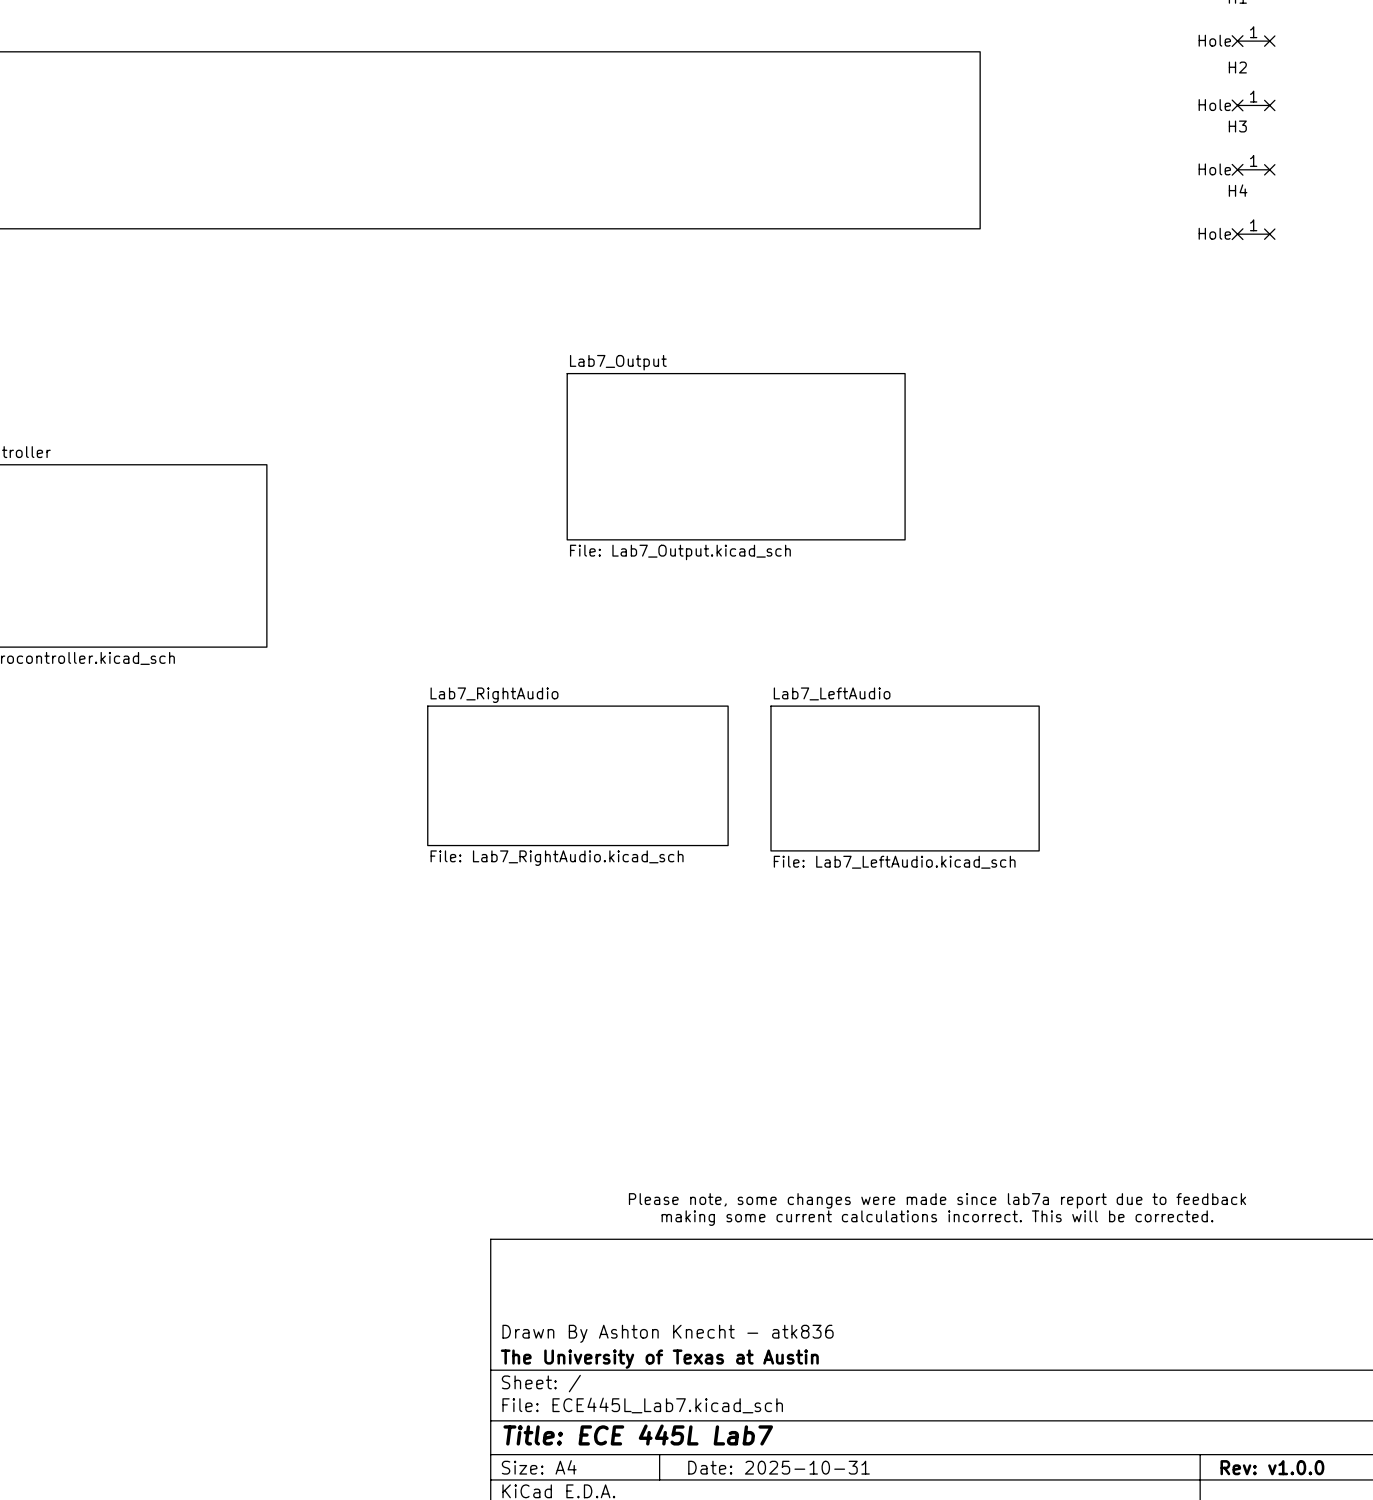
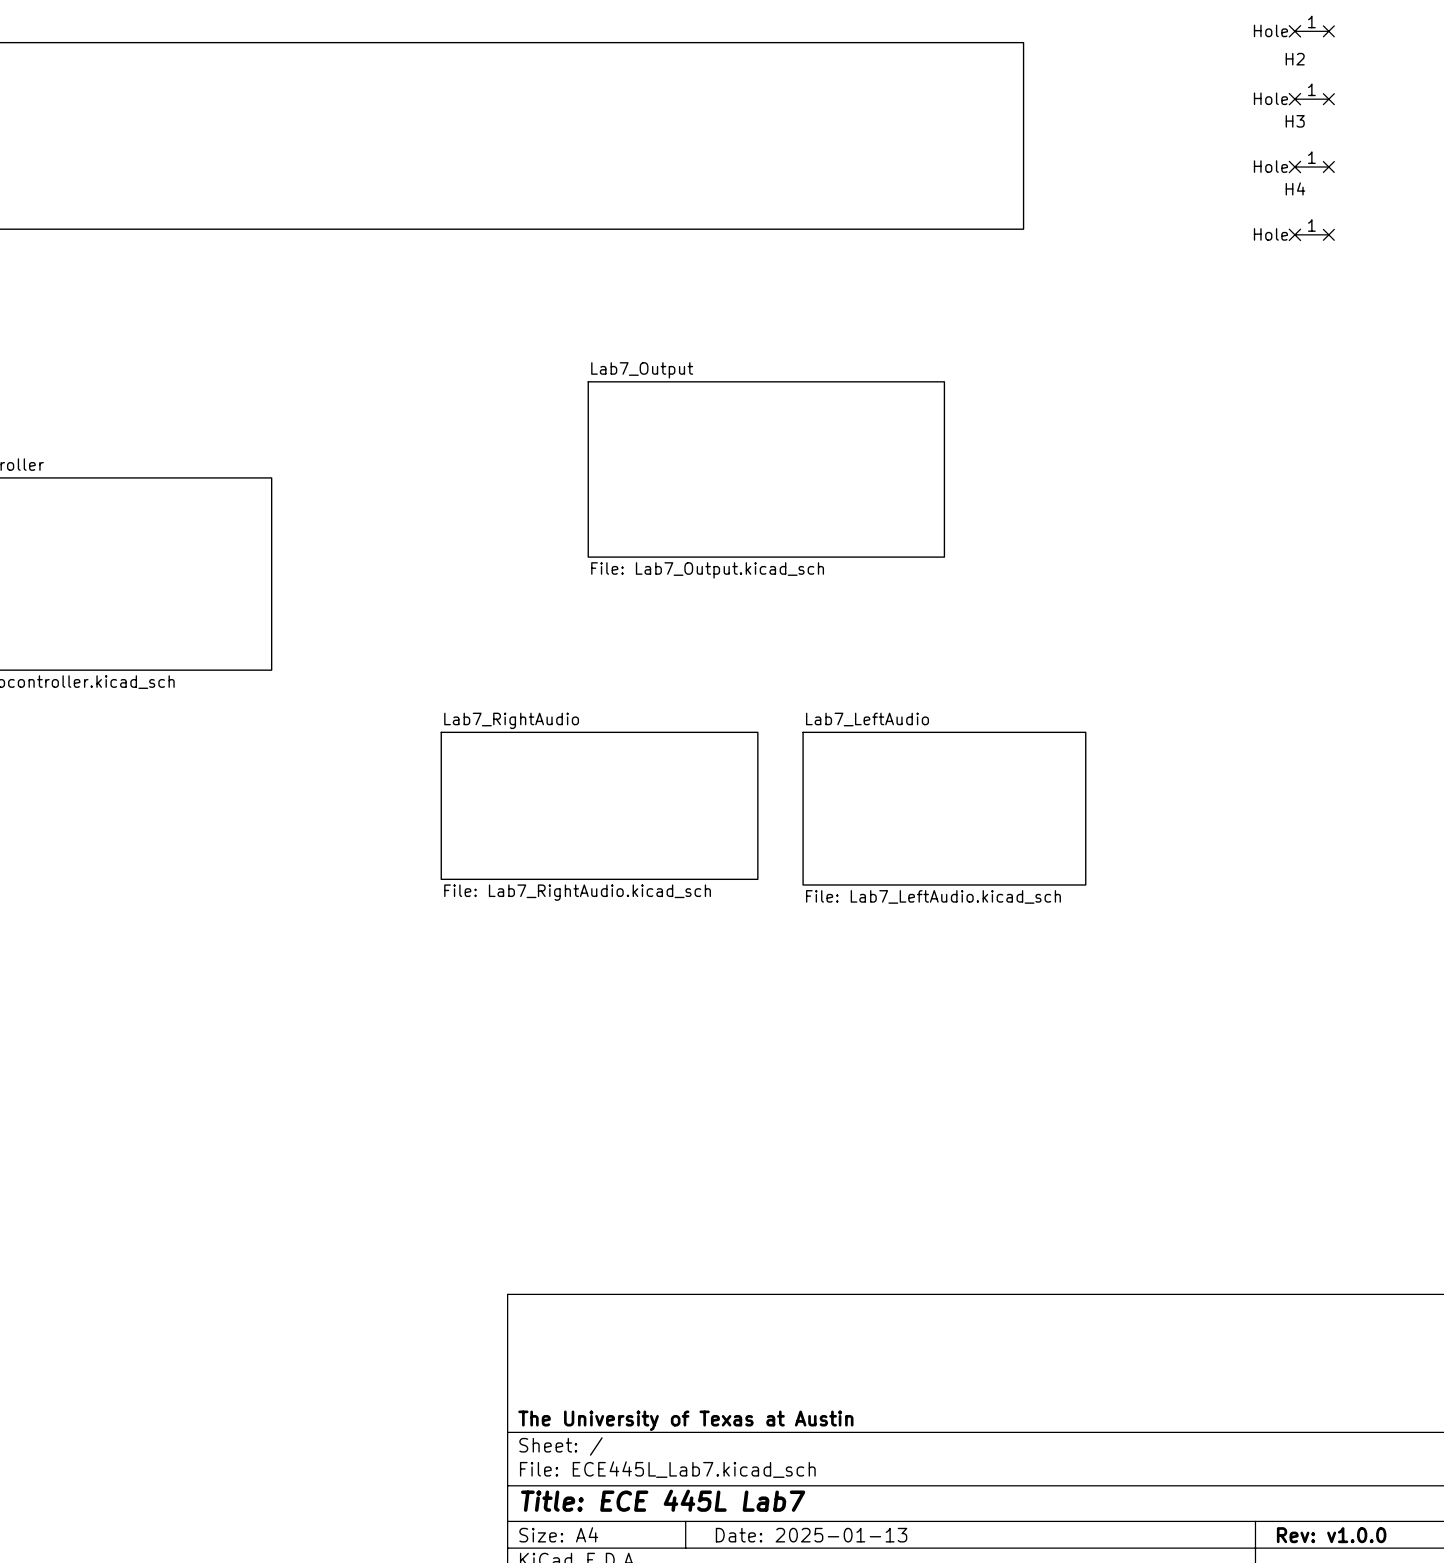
text: Please note, some changes were made since lab7a report due to feedback (937, 1200) -> none
text: making some current calculations incorrect. This will be corrected. (937, 1218) -> none
title block: Drawn By Ashton Knecht - atk836 (668, 1333) -> none
title block: Date: 2025-10-31 (779, 1467) -> Date: 2025-01-13 (811, 1535)

